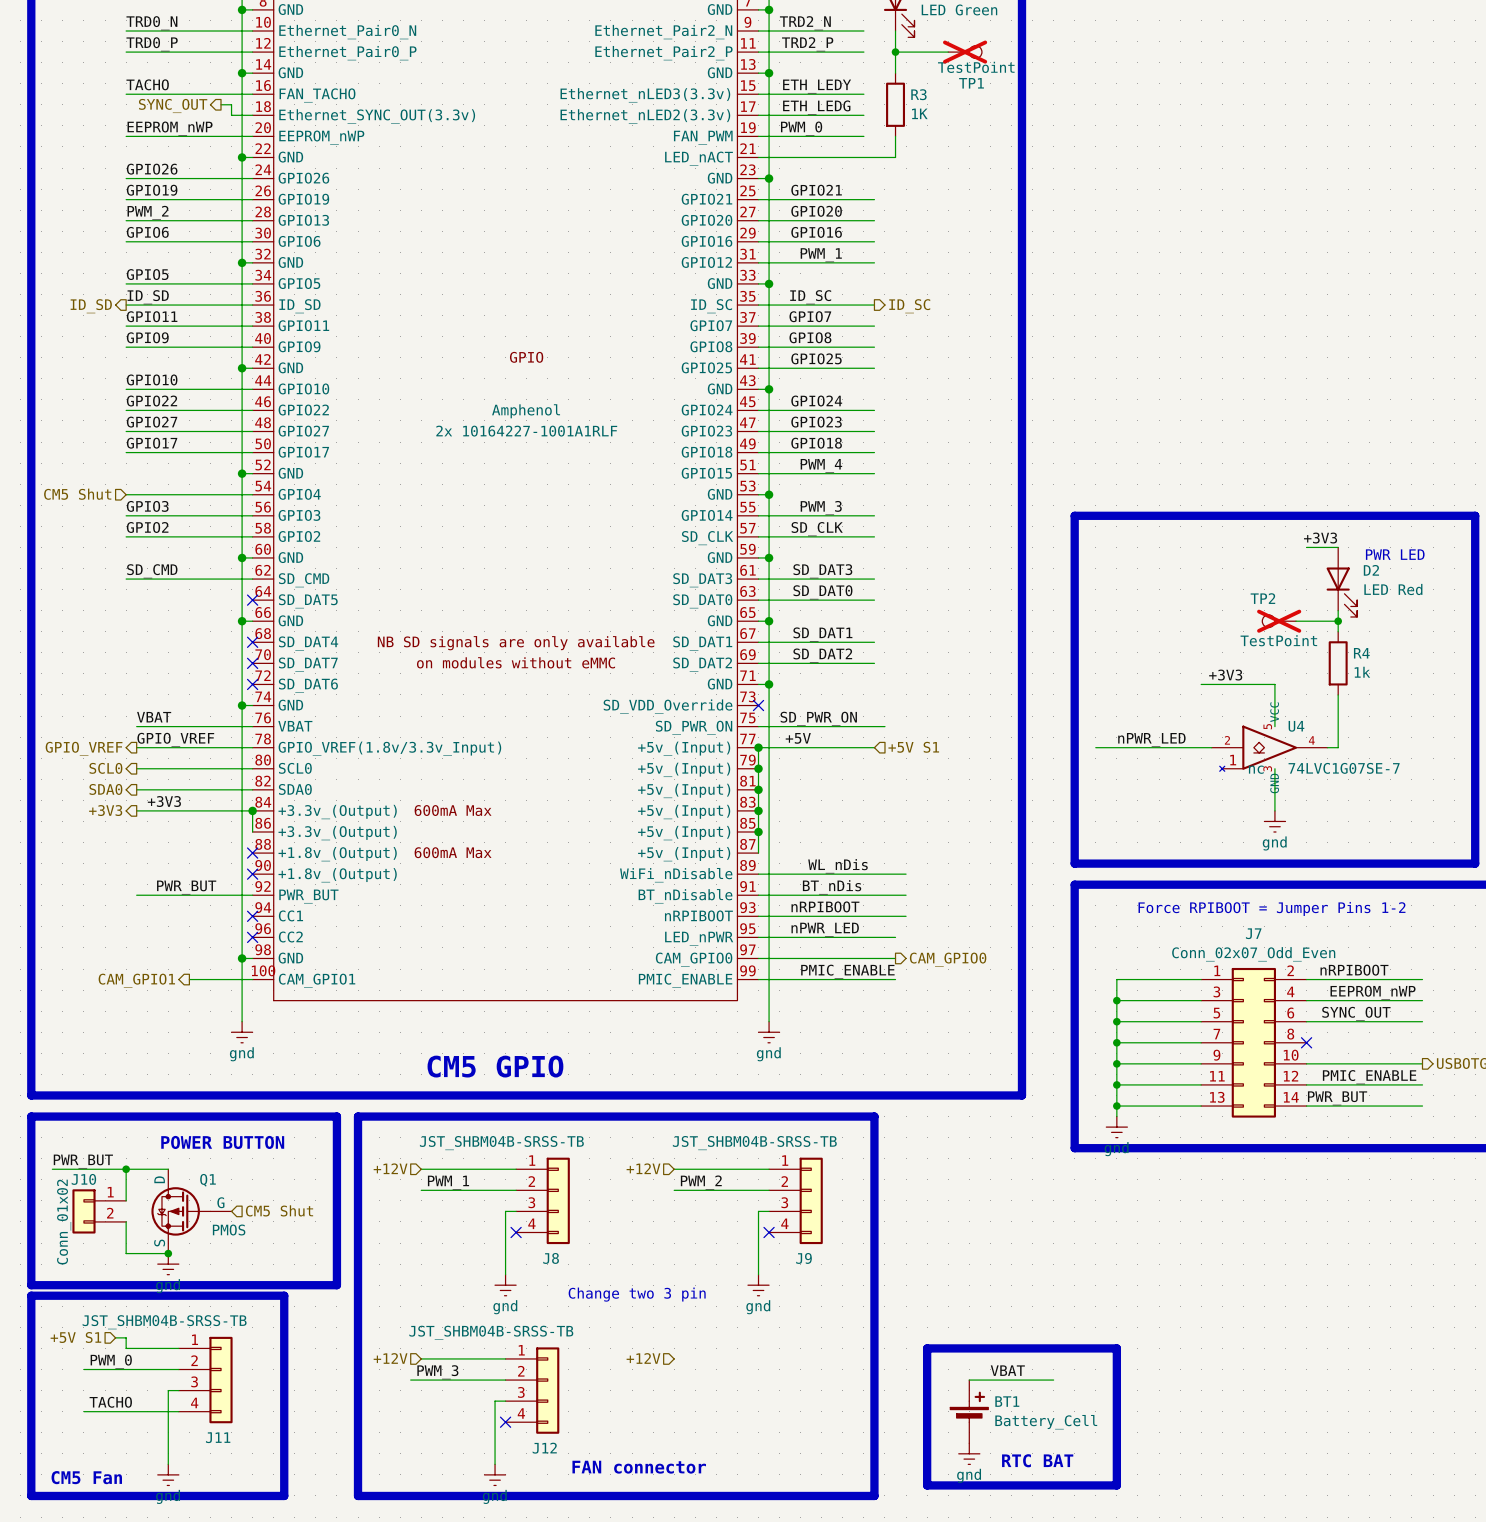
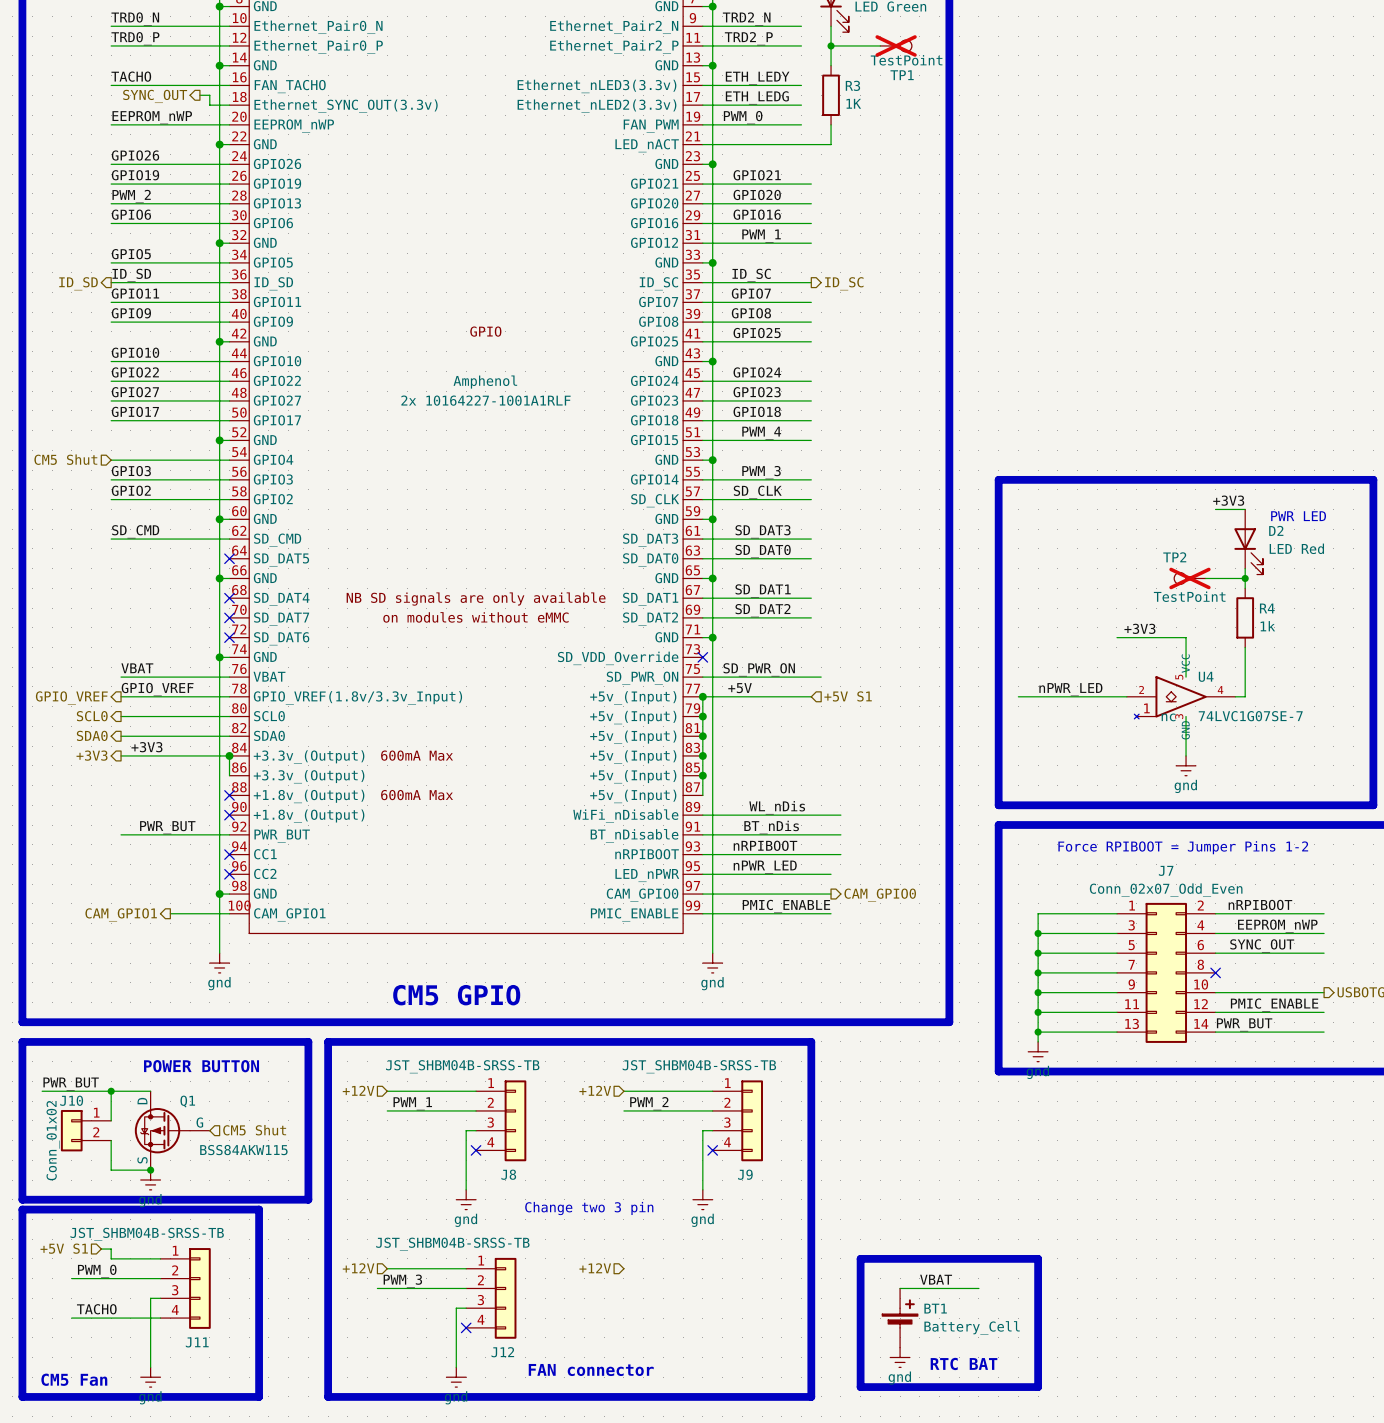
Q1 value: PMOS (229, 1230) -> BSS84AKW115 (243, 1150)

